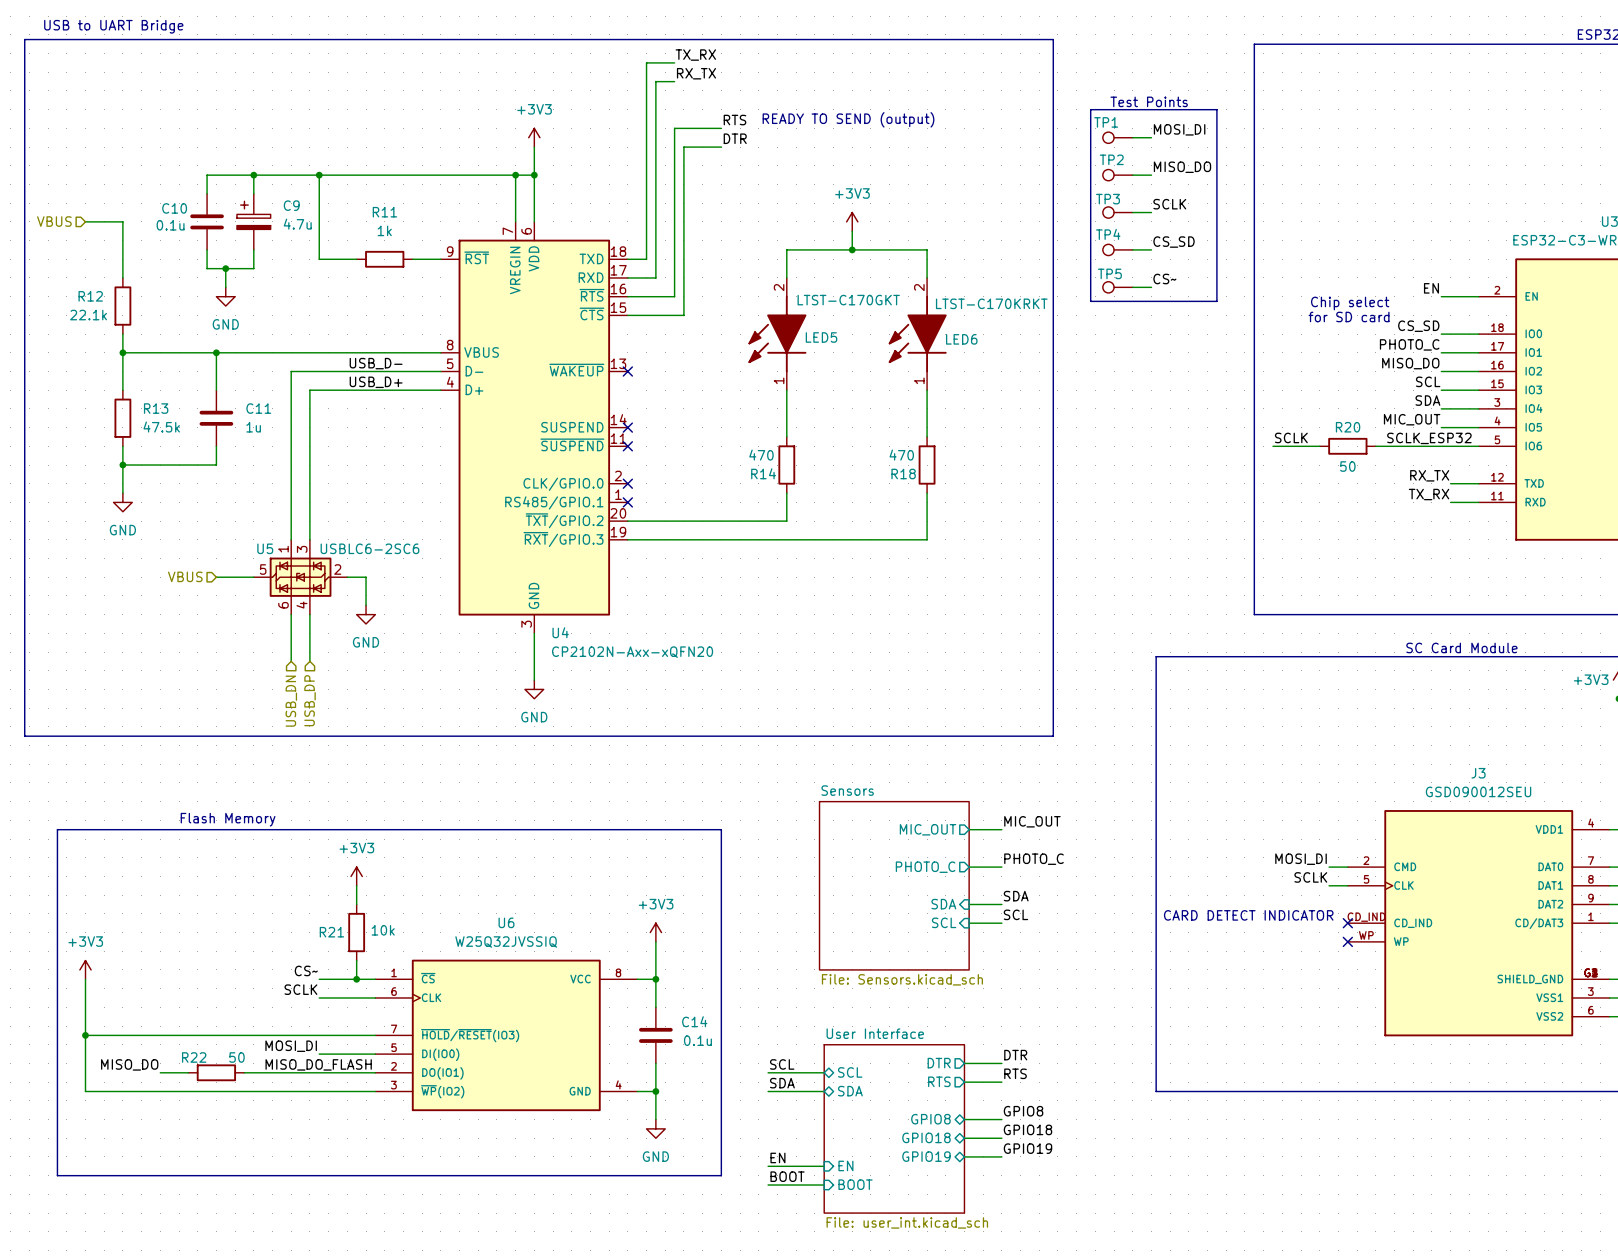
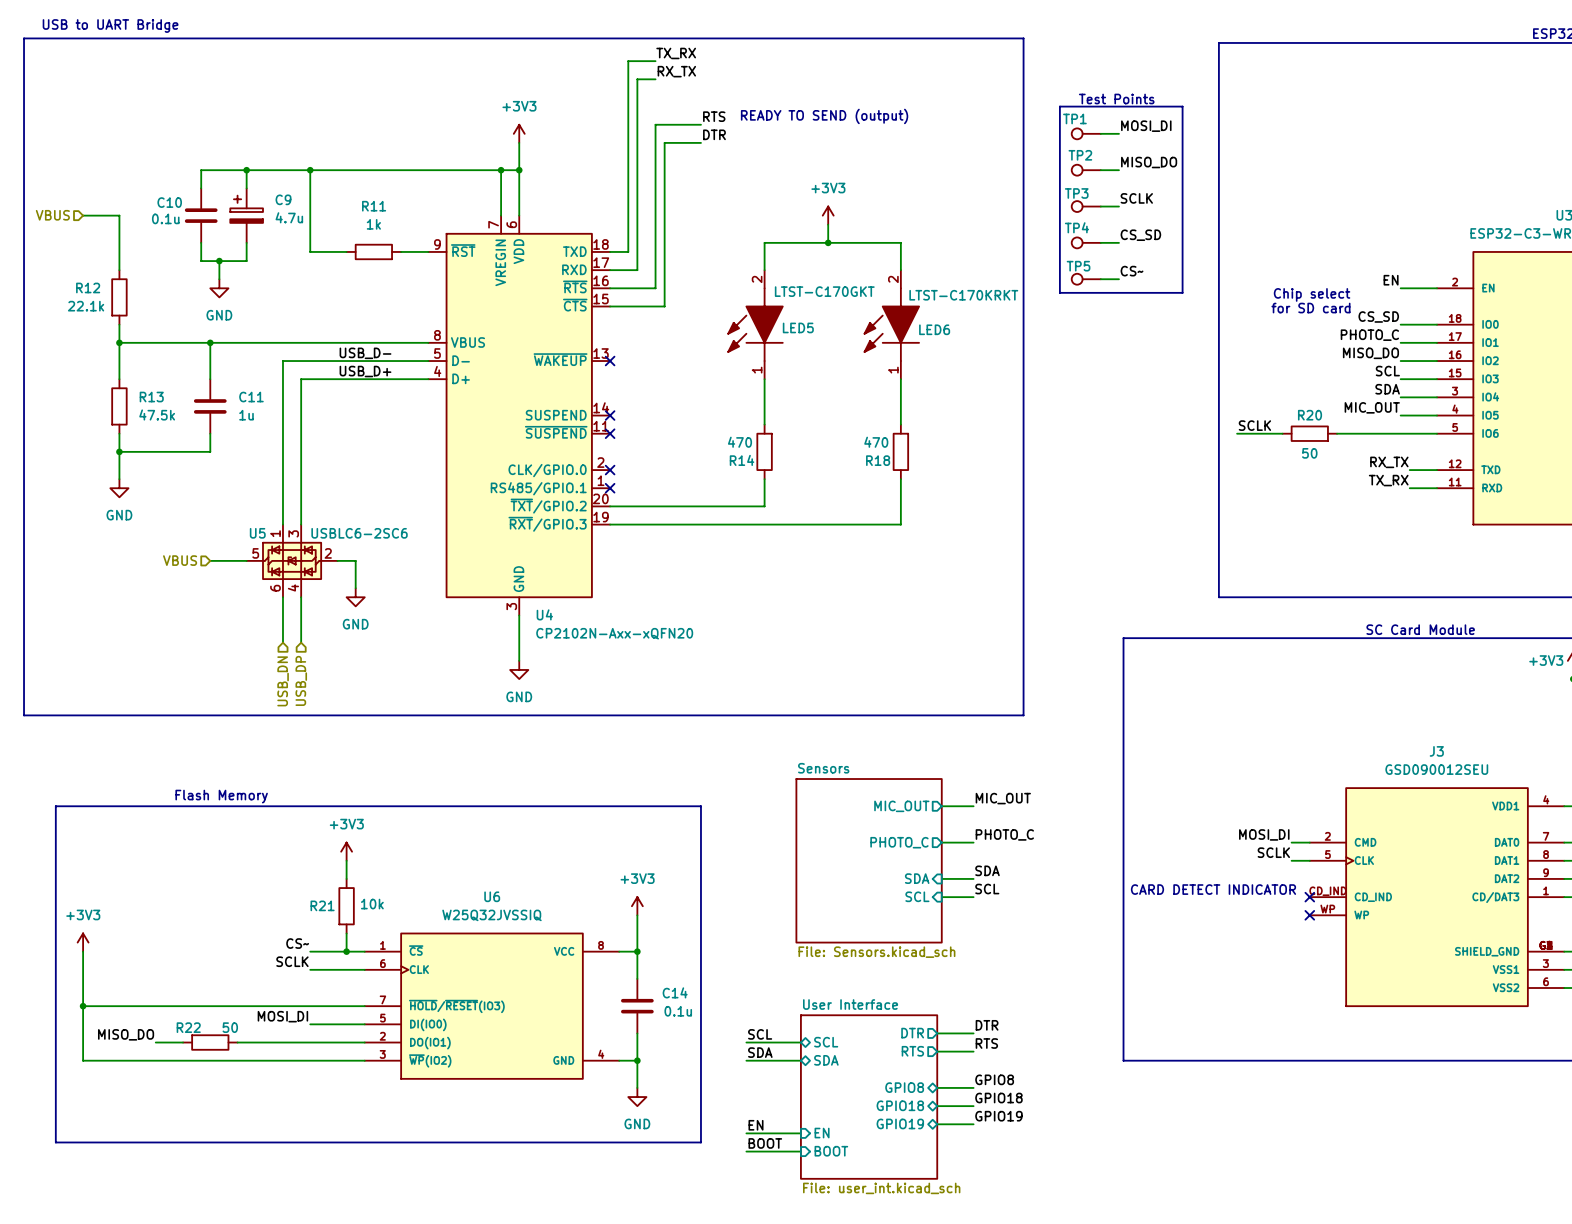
label: SCLK_ESP32 (1429, 438) -> none
label: MISO_DO_FLASH (318, 1064) -> none

